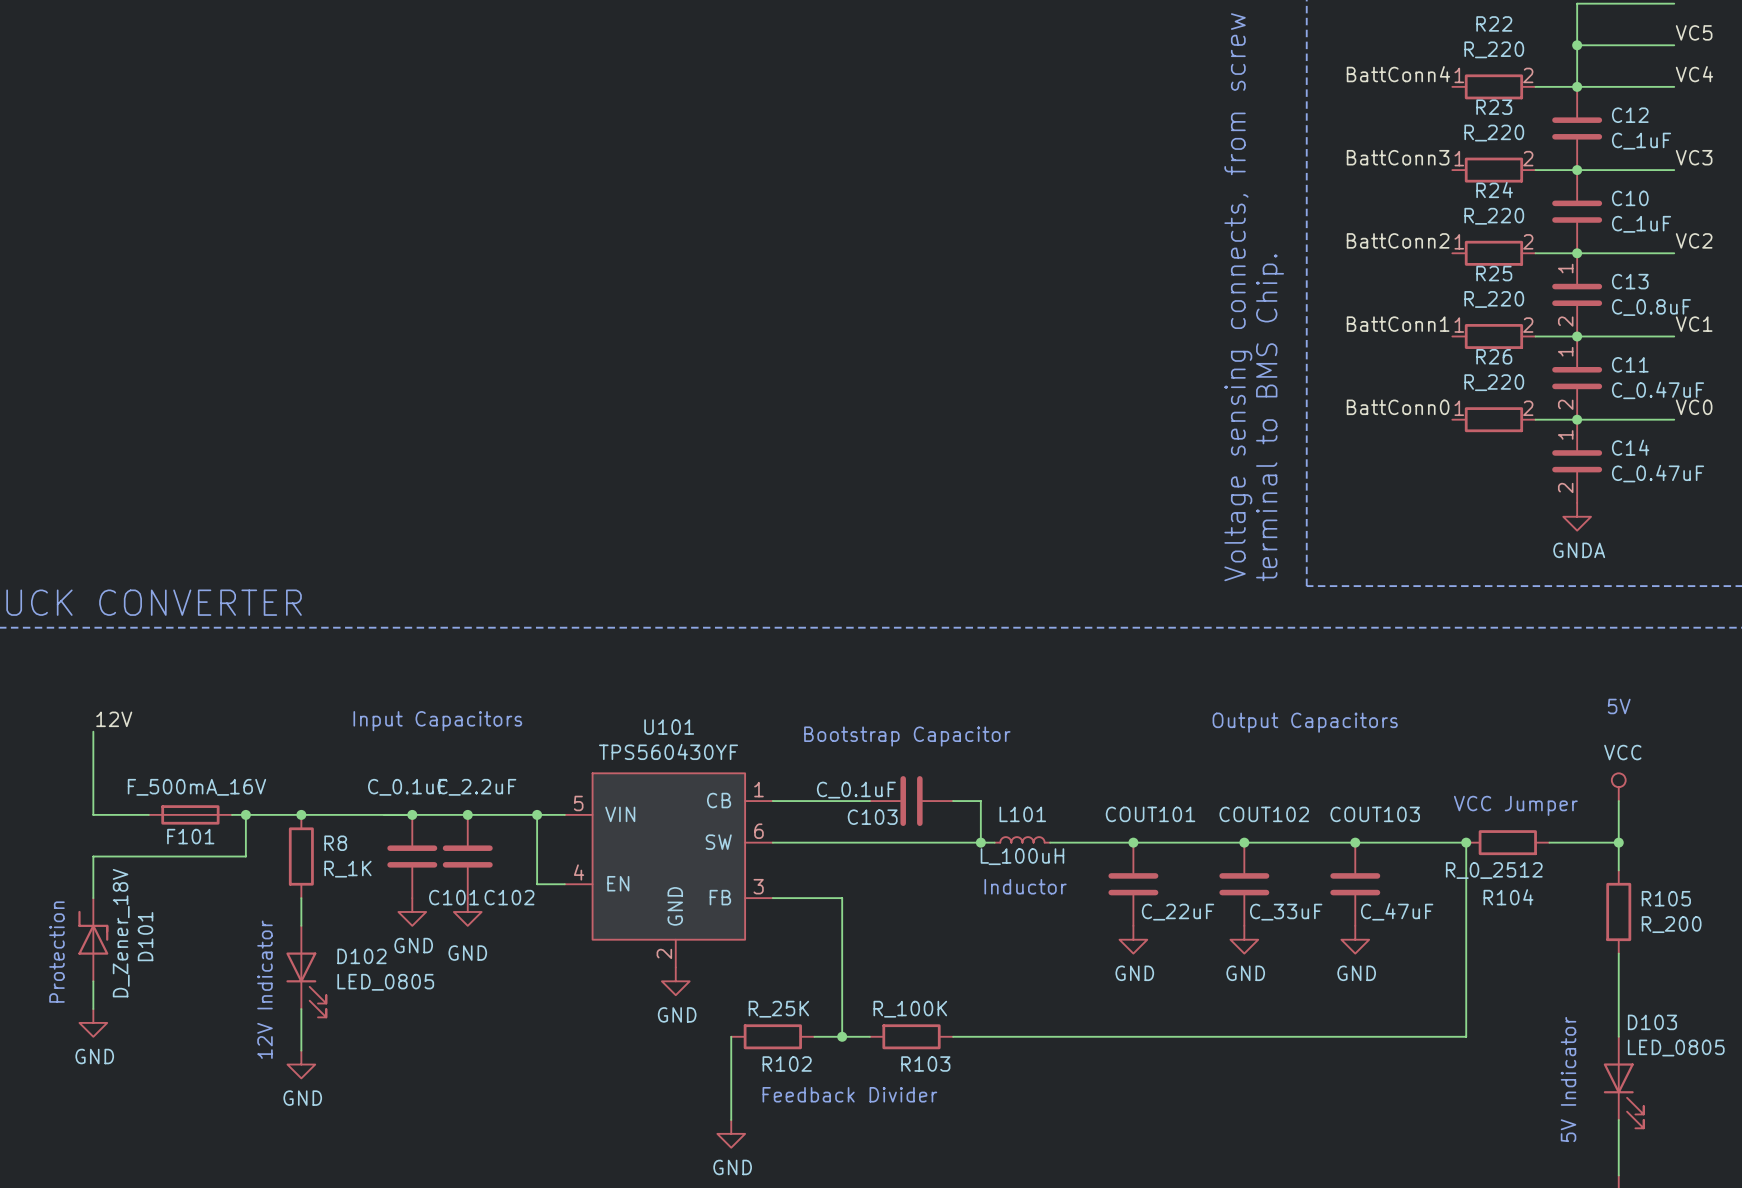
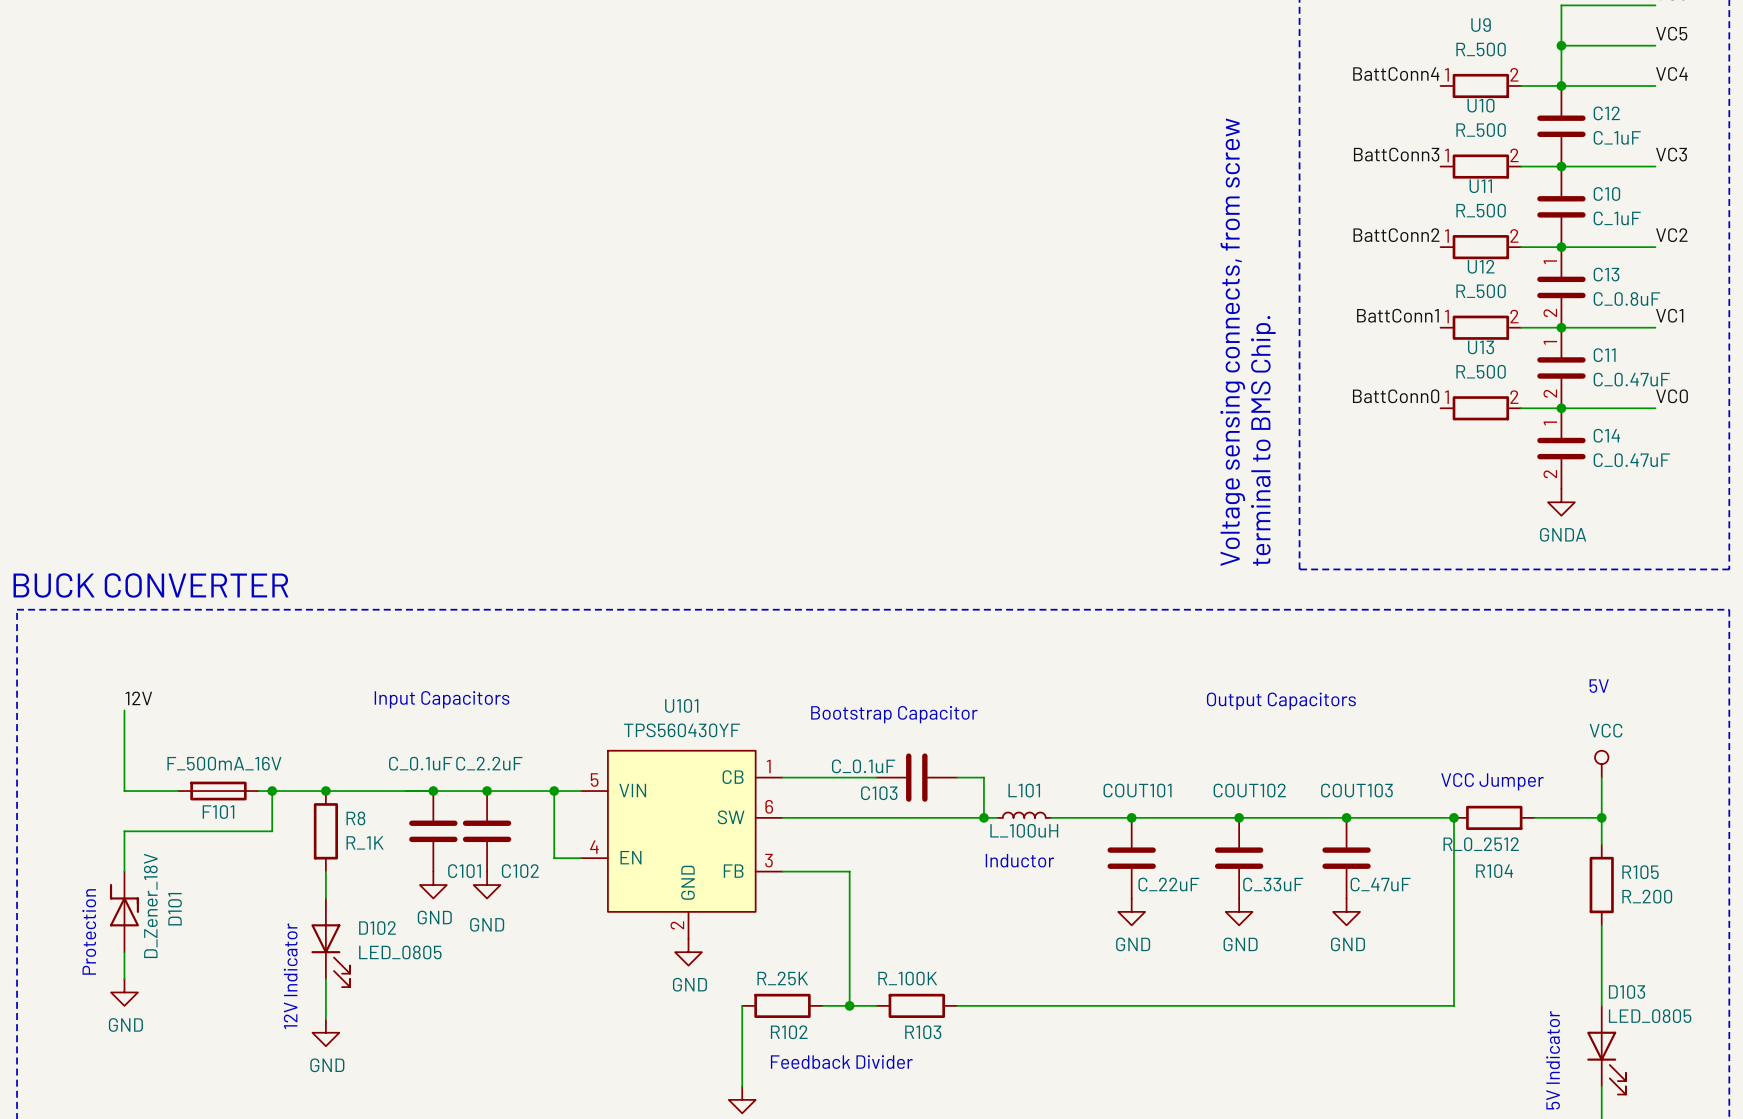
R22 name: R22 (1494, 23) -> U9 (1481, 25)
R22 value: R_220 (1494, 49) -> R_500 (1481, 49)
R23 name: R23 (1494, 107) -> U10 (1480, 105)
R23 value: R_220 (1494, 133) -> R_500 (1481, 130)
R24 name: R24 (1494, 190) -> U11 (1480, 186)
R24 value: R_220 (1494, 216) -> R_500 (1481, 210)
R25 name: R25 (1494, 273) -> U12 (1481, 266)
R25 value: R_220 (1494, 299) -> R_500 (1481, 291)
R26 name: R26 (1494, 356) -> U13 (1481, 347)
R26 value: R_220 (1494, 382) -> R_500 (1481, 371)

